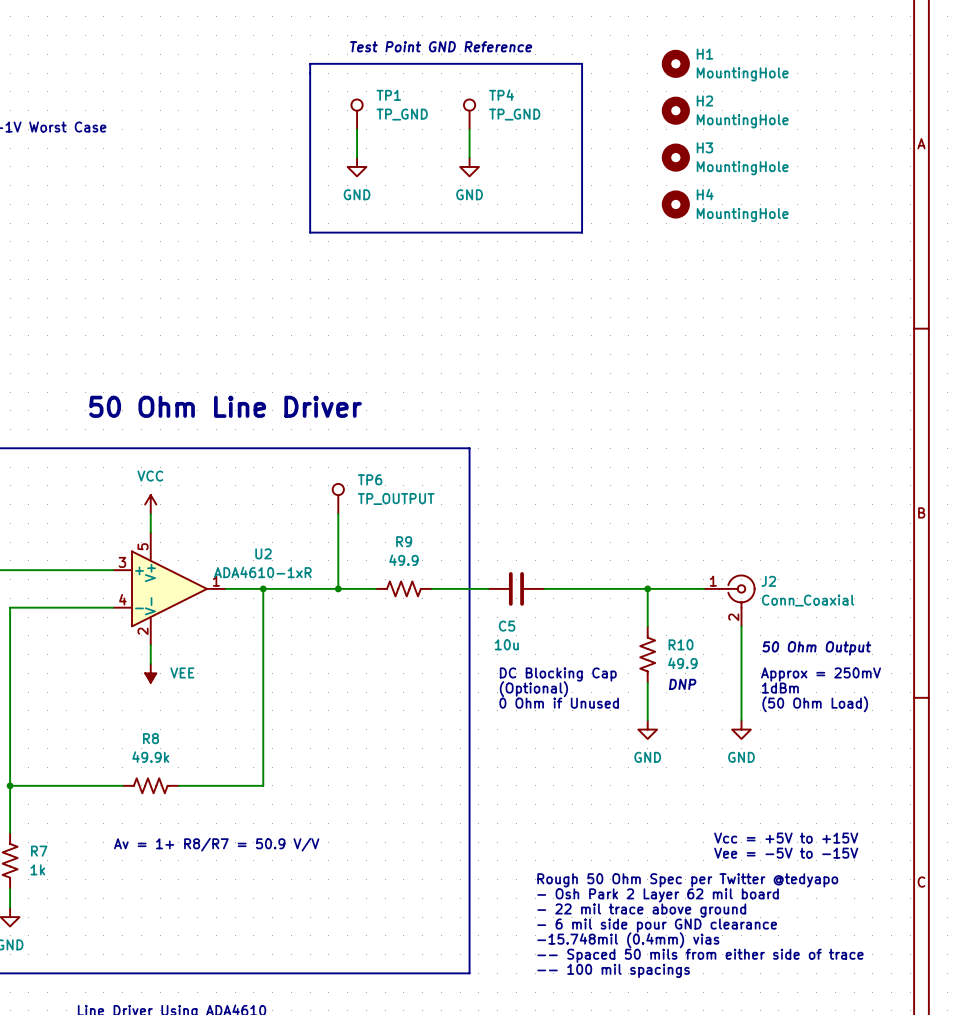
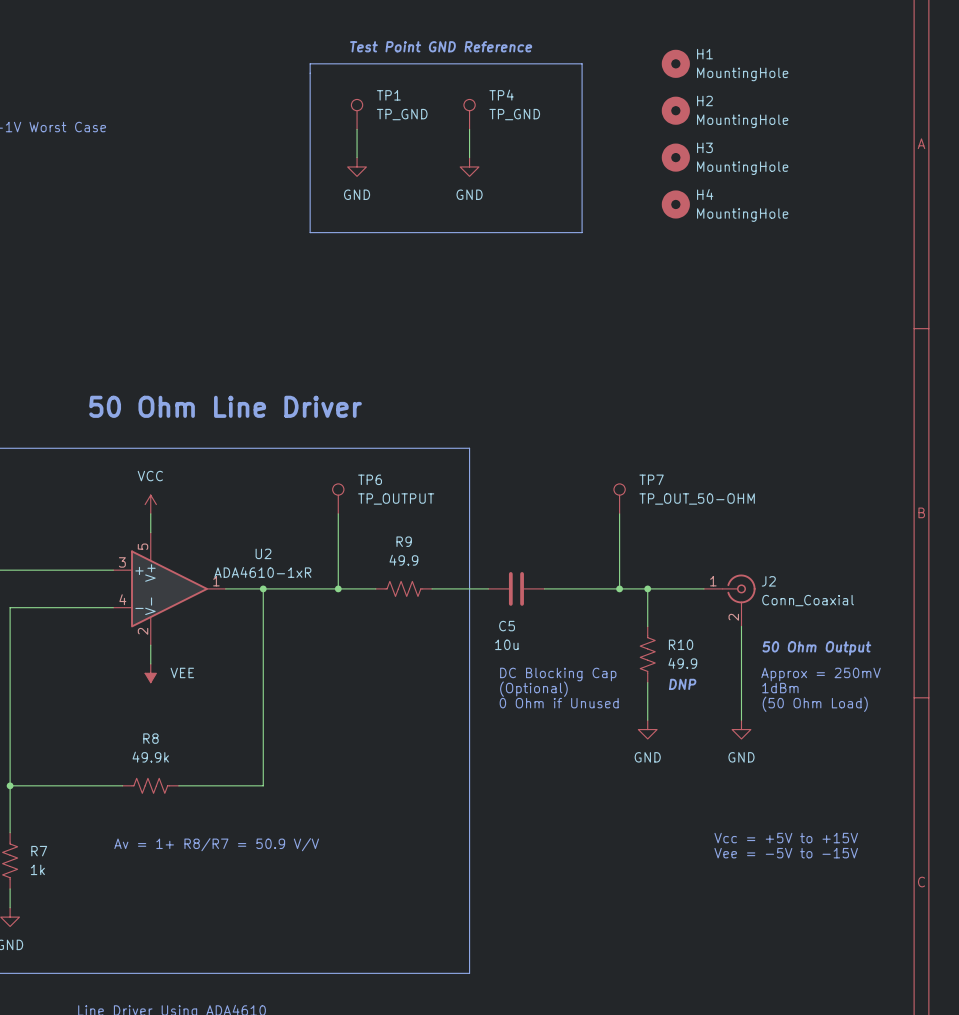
TP7: none -> TP_OUT_50-OHM (619, 498)
wire: none -> (619, 513) (619, 588)
junction: none -> (619, 588)
text: Rough 50 Ohm Spec per Twitter @tedyapo (687, 880) -> none
text: - Osh Park 2 Layer 62 mil board (658, 895) -> none
text: - 22 mil trace above ground (641, 910) -> none
text: - 6 mil side pour GND clearance (657, 925) -> none
text: -15.748mil (0.4mm) vias (628, 940) -> none
text: -- Spaced 50 mils from either side of trace (700, 955) -> none
text: -- 100 mil spacings (613, 970) -> none

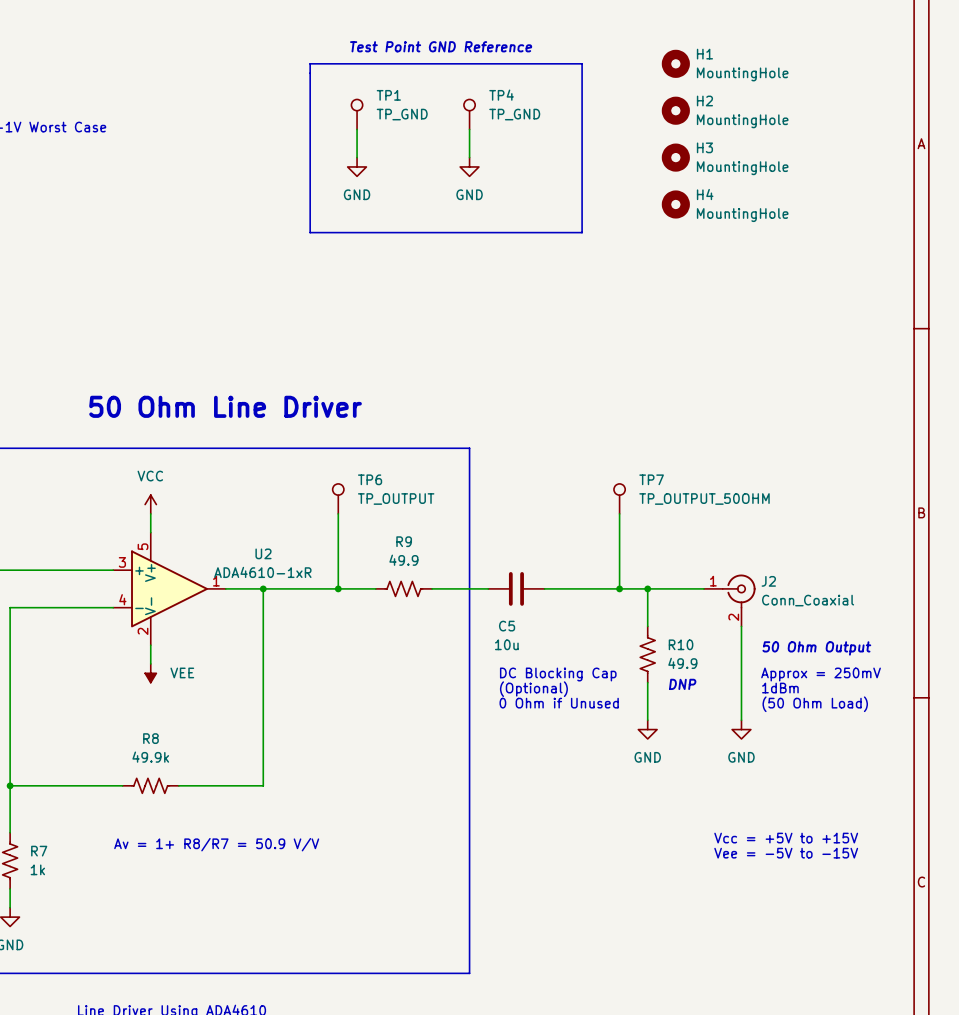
TP7 value: TP_OUT_50-OHM (697, 499) -> TP_OUTPUT_50OHM (704, 499)

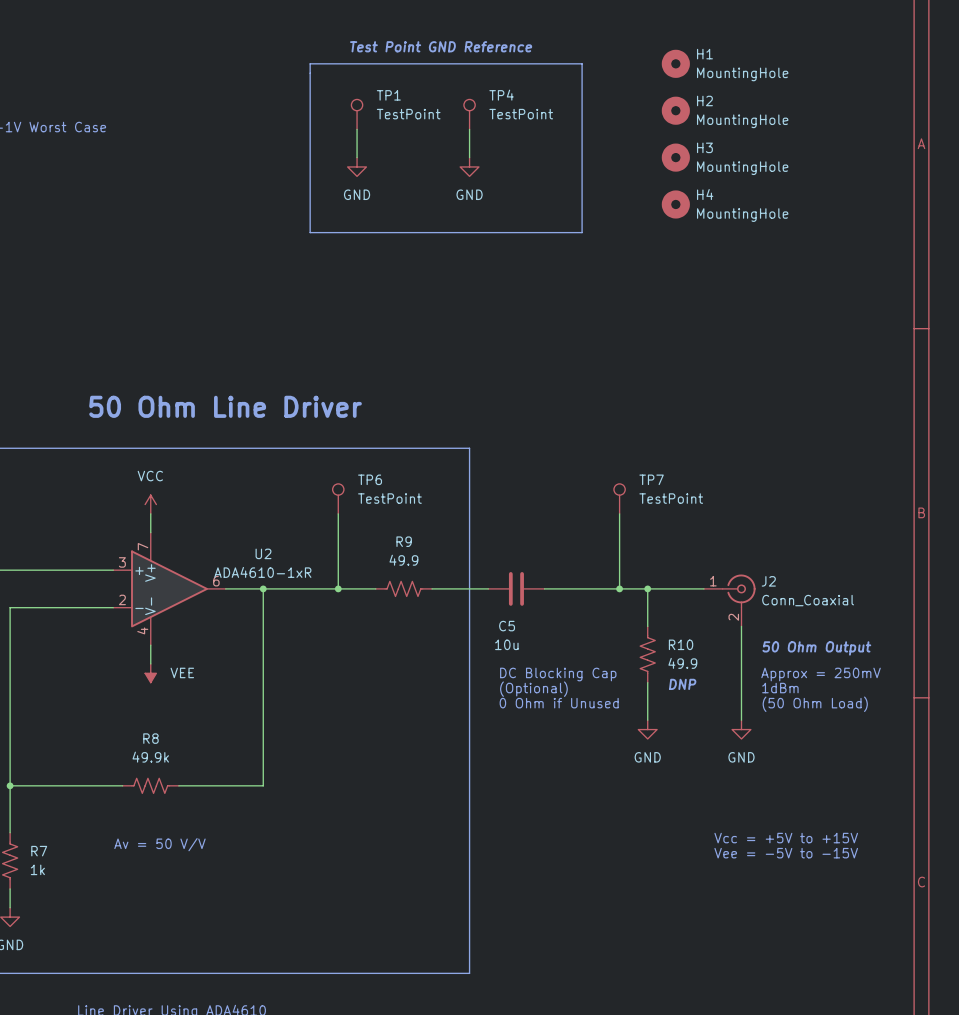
TP1 value: TP_GND (402, 114) -> TestPoint (408, 114)
TP4 value: TP_GND (514, 114) -> TestPoint (521, 114)
TP6 value: TP_OUTPUT (396, 499) -> TestPoint (389, 498)
TP7 value: TP_OUTPUT_50OHM (704, 499) -> TestPoint (671, 498)
U2 pin number: 5 (143, 546) -> 7 (143, 546)
U2 pin number: 1 (216, 581) -> 6 (216, 581)
U2 pin number: 4 (122, 599) -> 2 (122, 599)
U2 pin number: 2 (143, 631) -> 4 (142, 630)
text: Av = 1+ R8/R7 = 50.9 V/V (216, 844) -> Av = 50 V/V (159, 844)

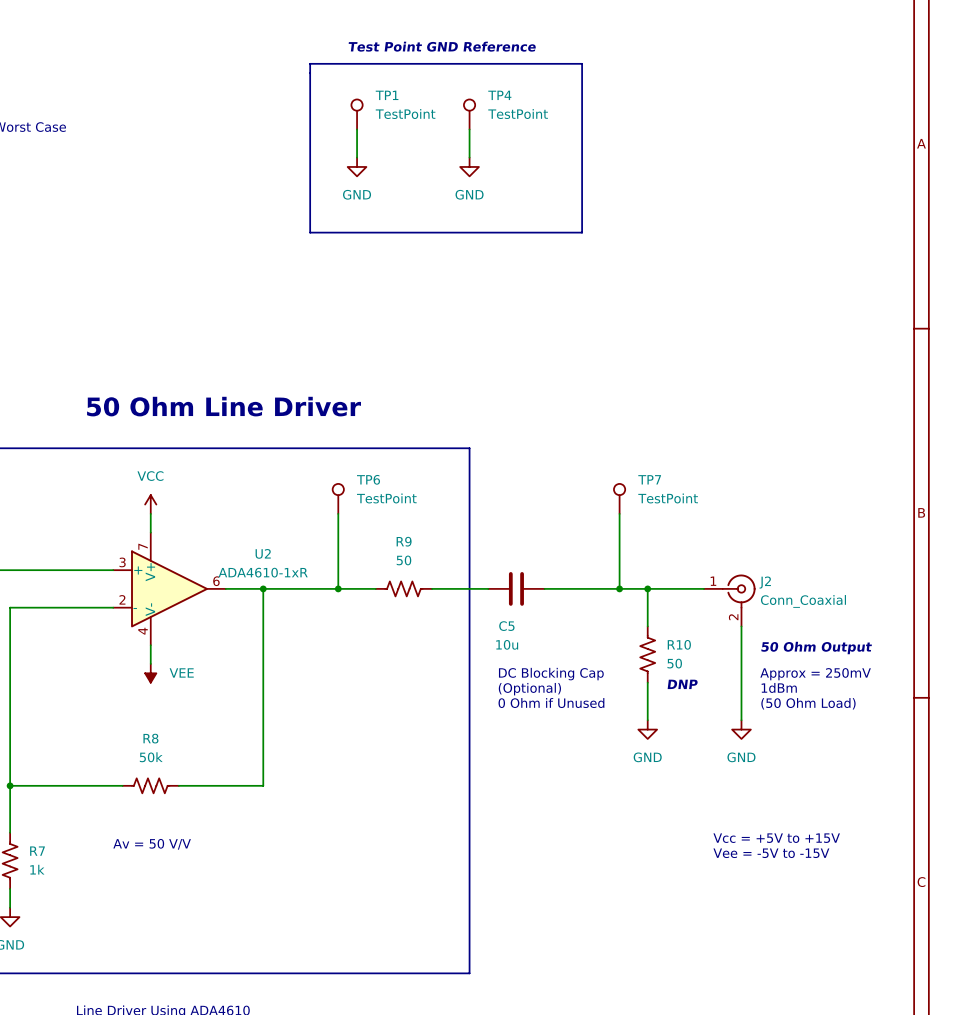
H1: MountingHole (675, 63) -> none
H2: MountingHole (675, 110) -> none
H3: MountingHole (675, 157) -> none
H4: MountingHole (675, 204) -> none
R9 value: 49.9 (403, 560) -> 50 (403, 560)
R10 value: 49.9 (682, 663) -> 50 (674, 663)
R8 value: 49.9k (150, 757) -> 50k (151, 757)

